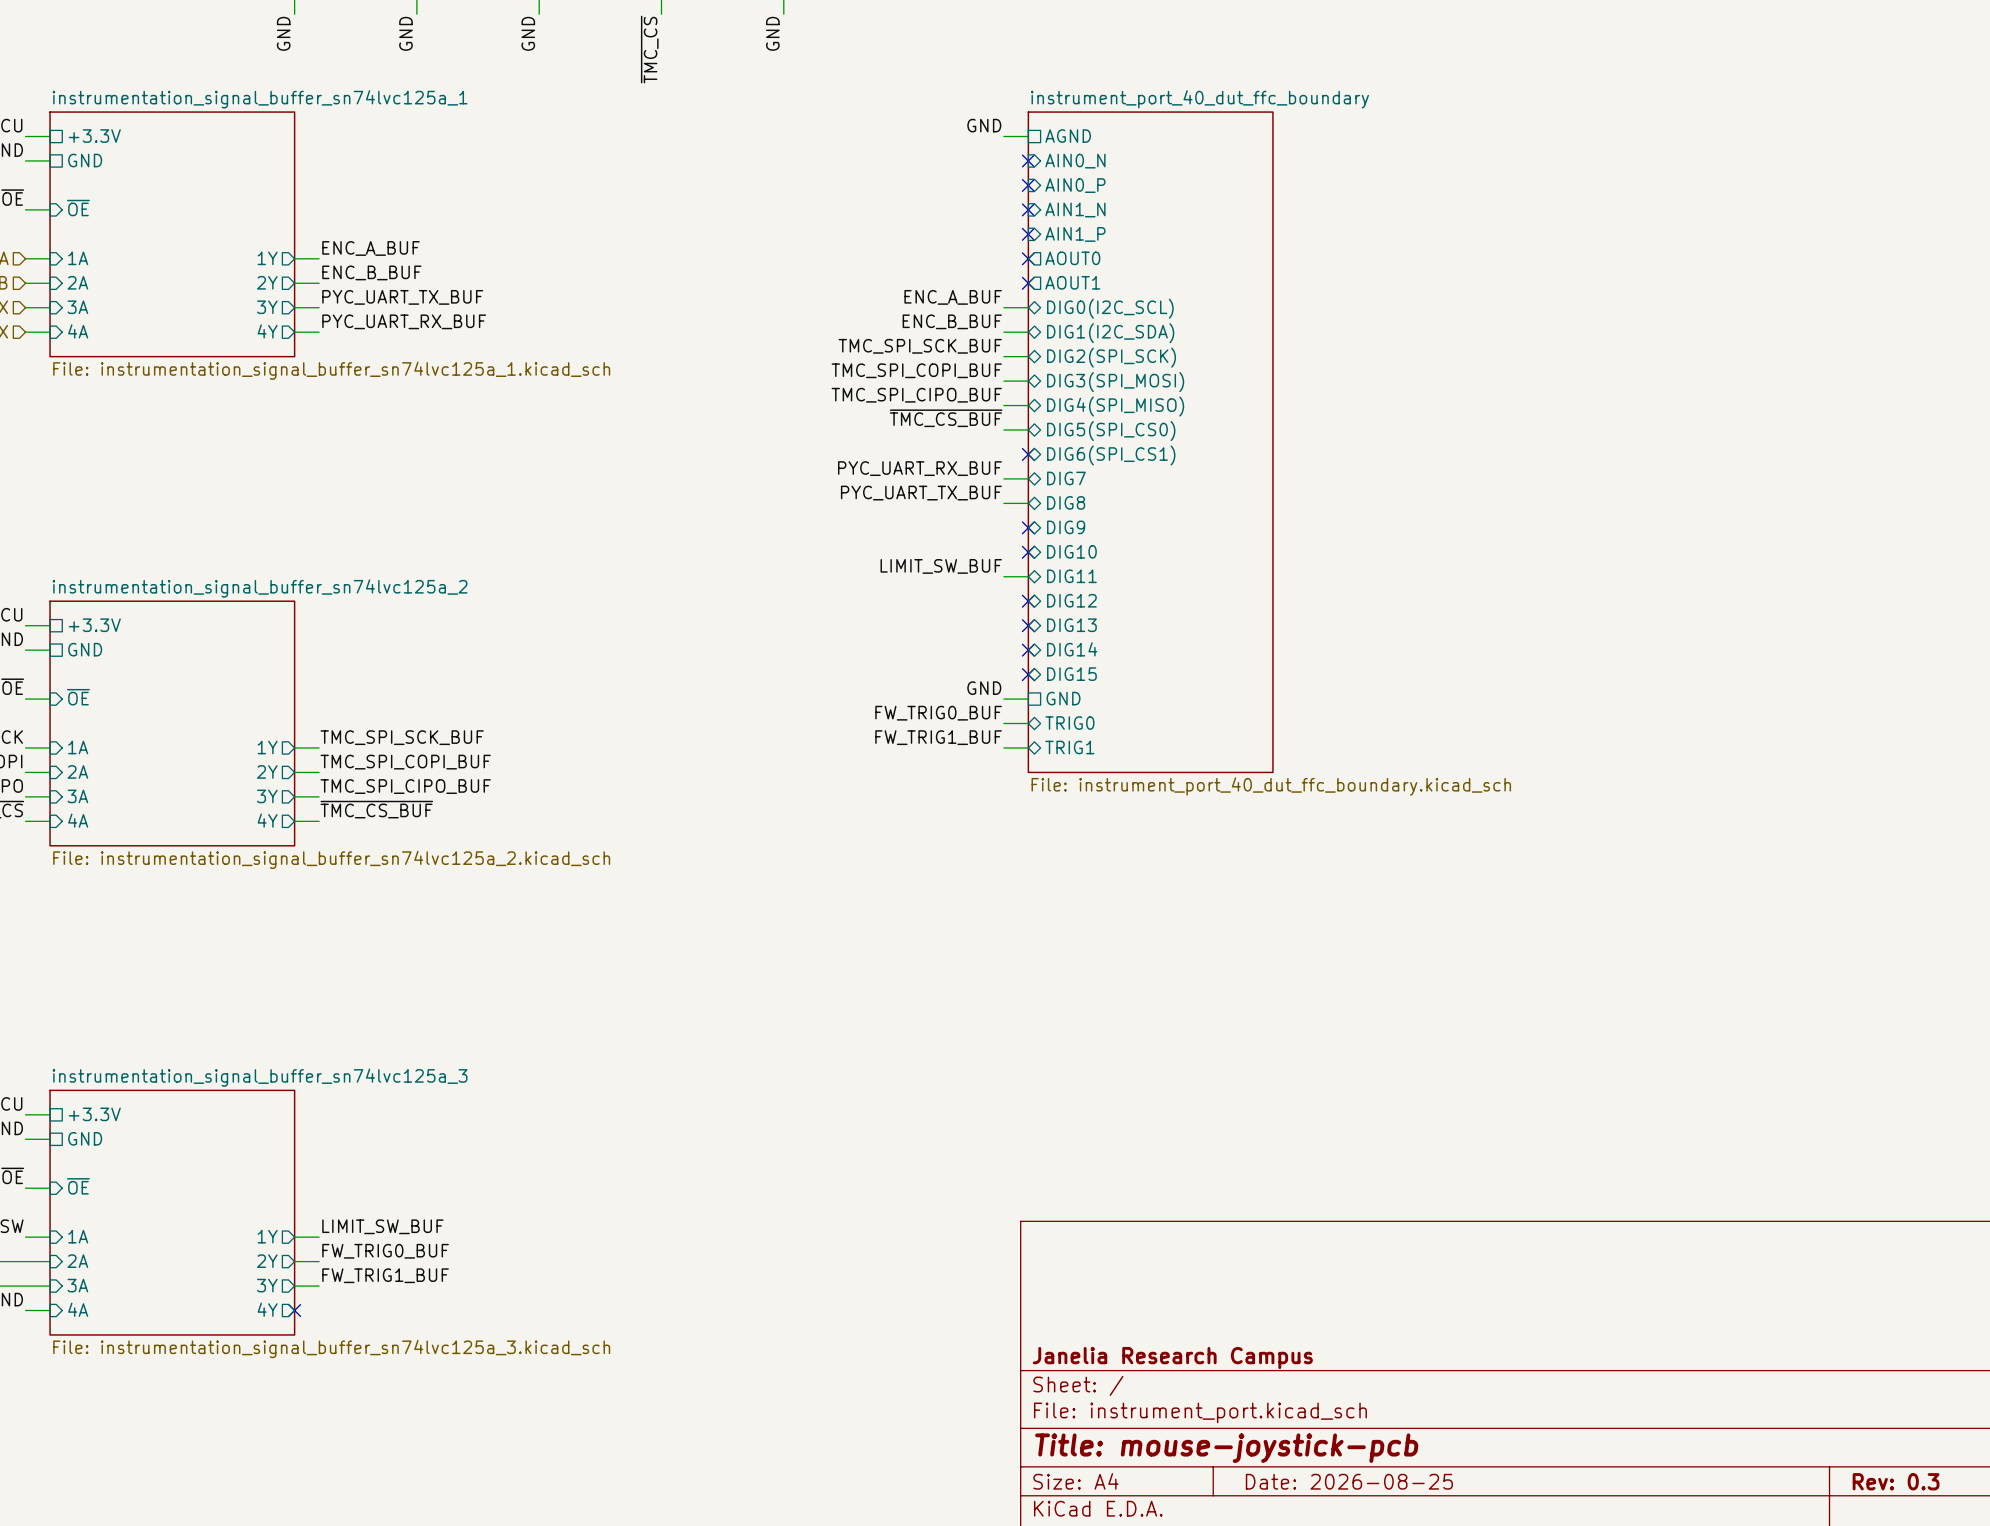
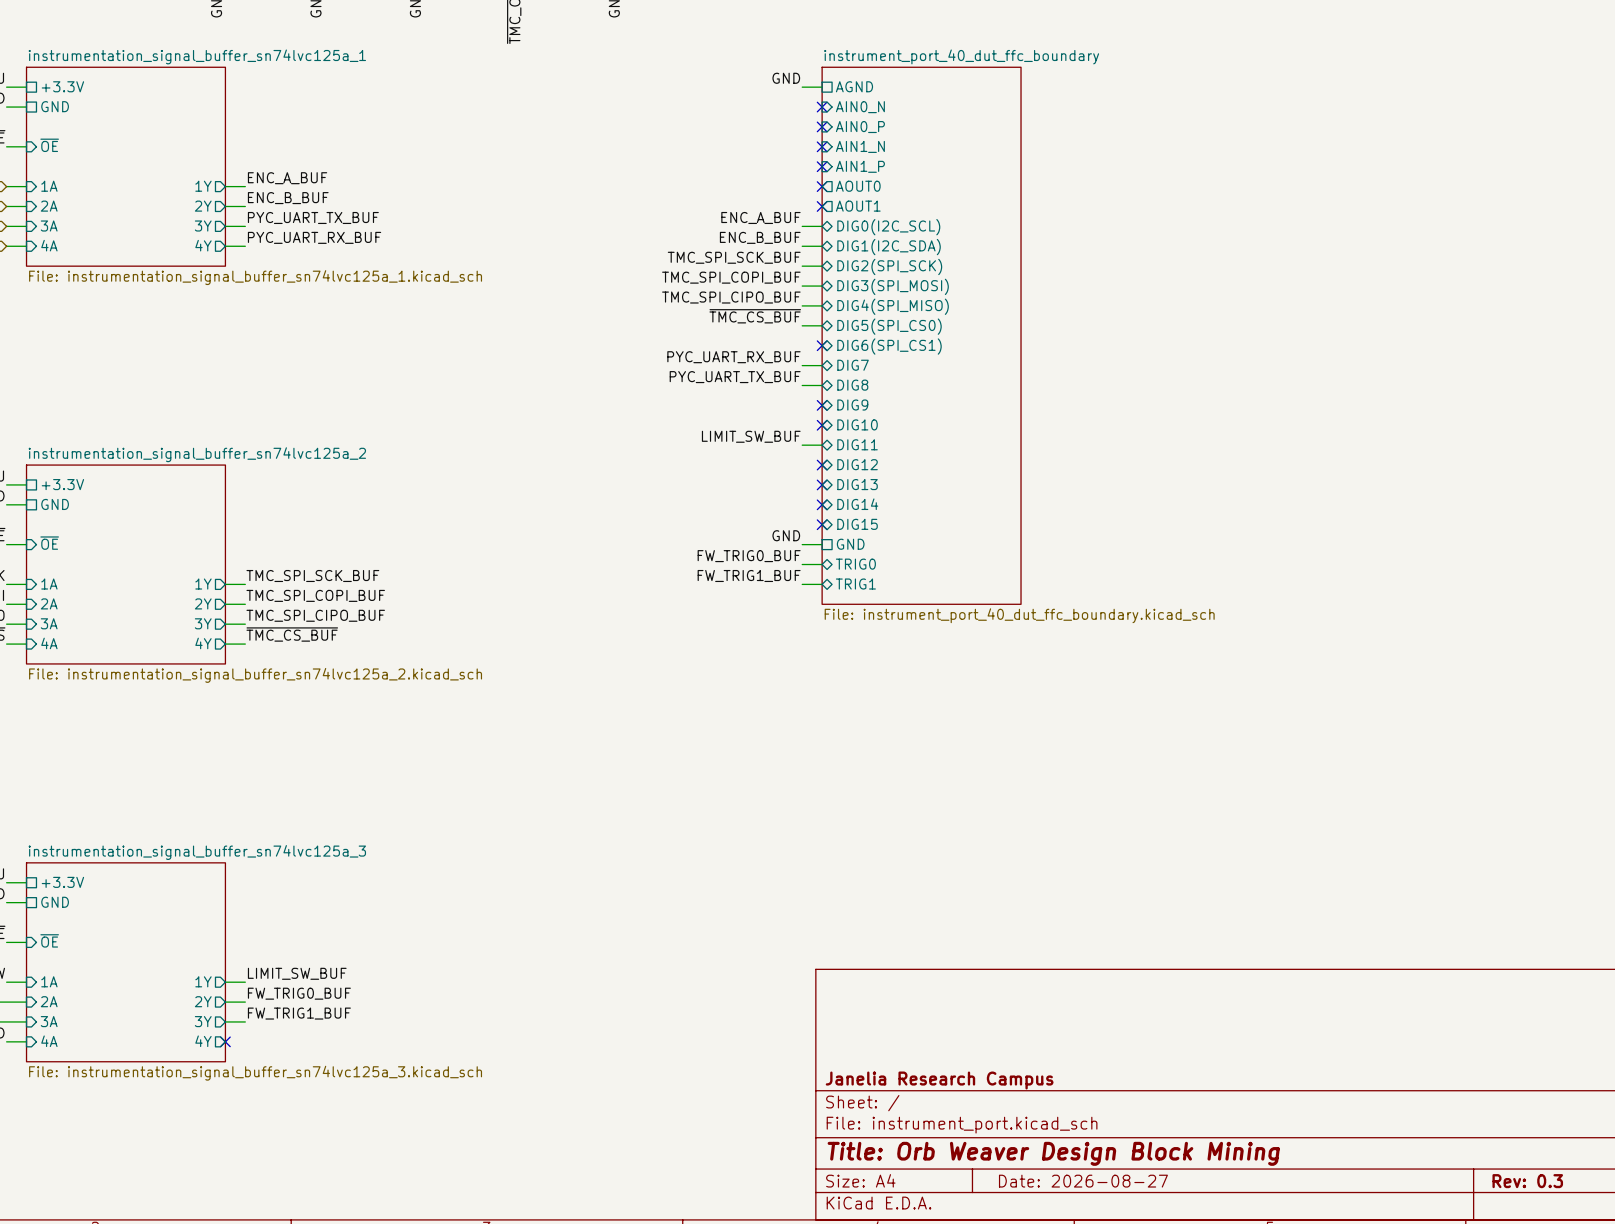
title block: Title: mouse-joystick-pcb (1226, 1448) -> Title: Orb Weaver Design Block Mining (1053, 1153)
title block: Date: 2026-08-25 (1349, 1481) -> Date: 2026-08-27 (1083, 1181)

